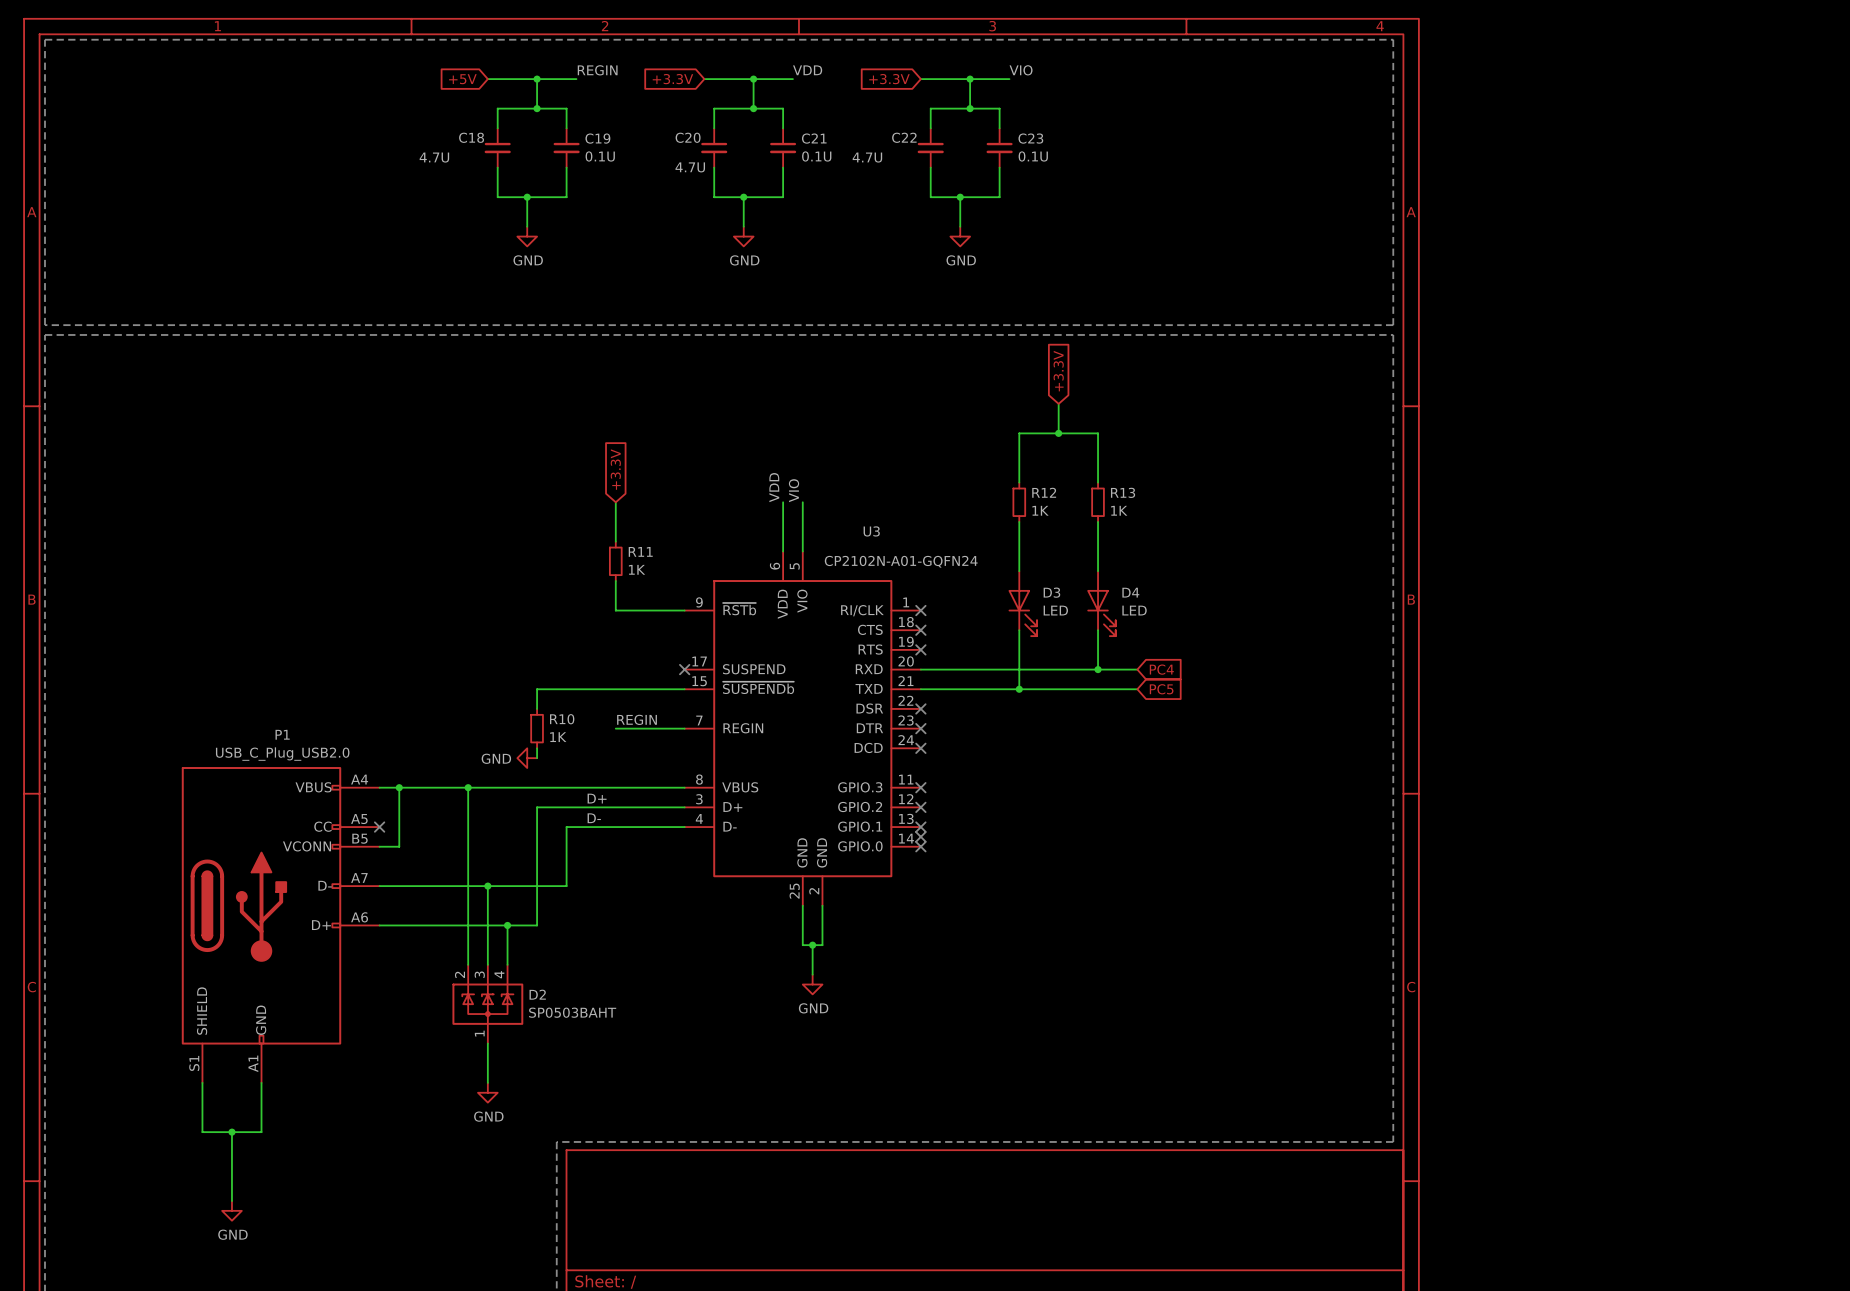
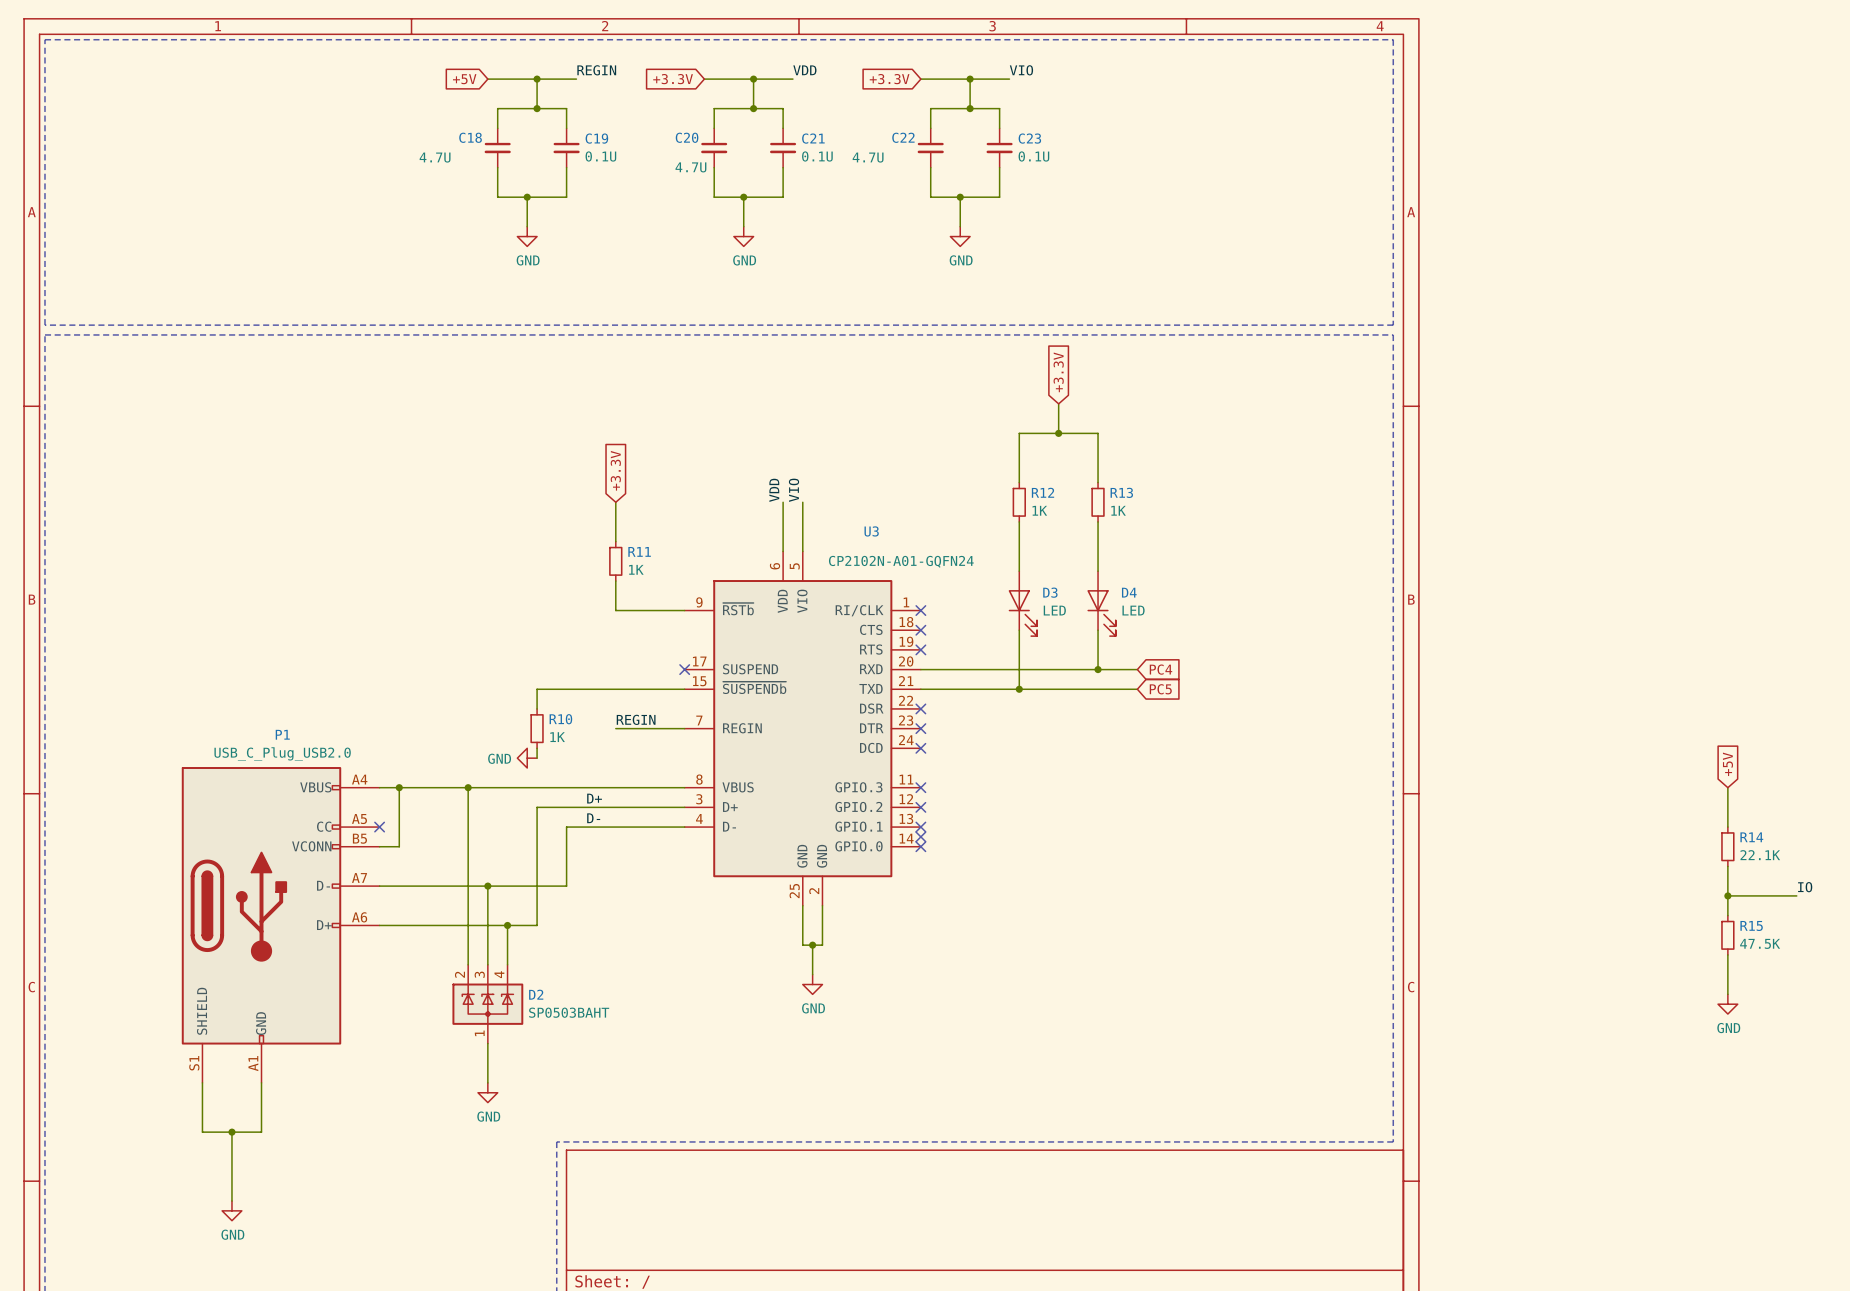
global label: none -> +5V (1727, 764)
wire: none -> (1727, 787) (1727, 827)
R14: none -> 22.1K (1727, 846)
wire: none -> (1727, 866) (1727, 915)
label: none -> IO (1805, 887)
wire: none -> (1727, 895) (1796, 895)
junction: none -> (1727, 895)
R15: none -> 47.5K (1727, 935)
wire: none -> (1727, 954) (1727, 994)
power symbol: none -> GND (1727, 1004)

